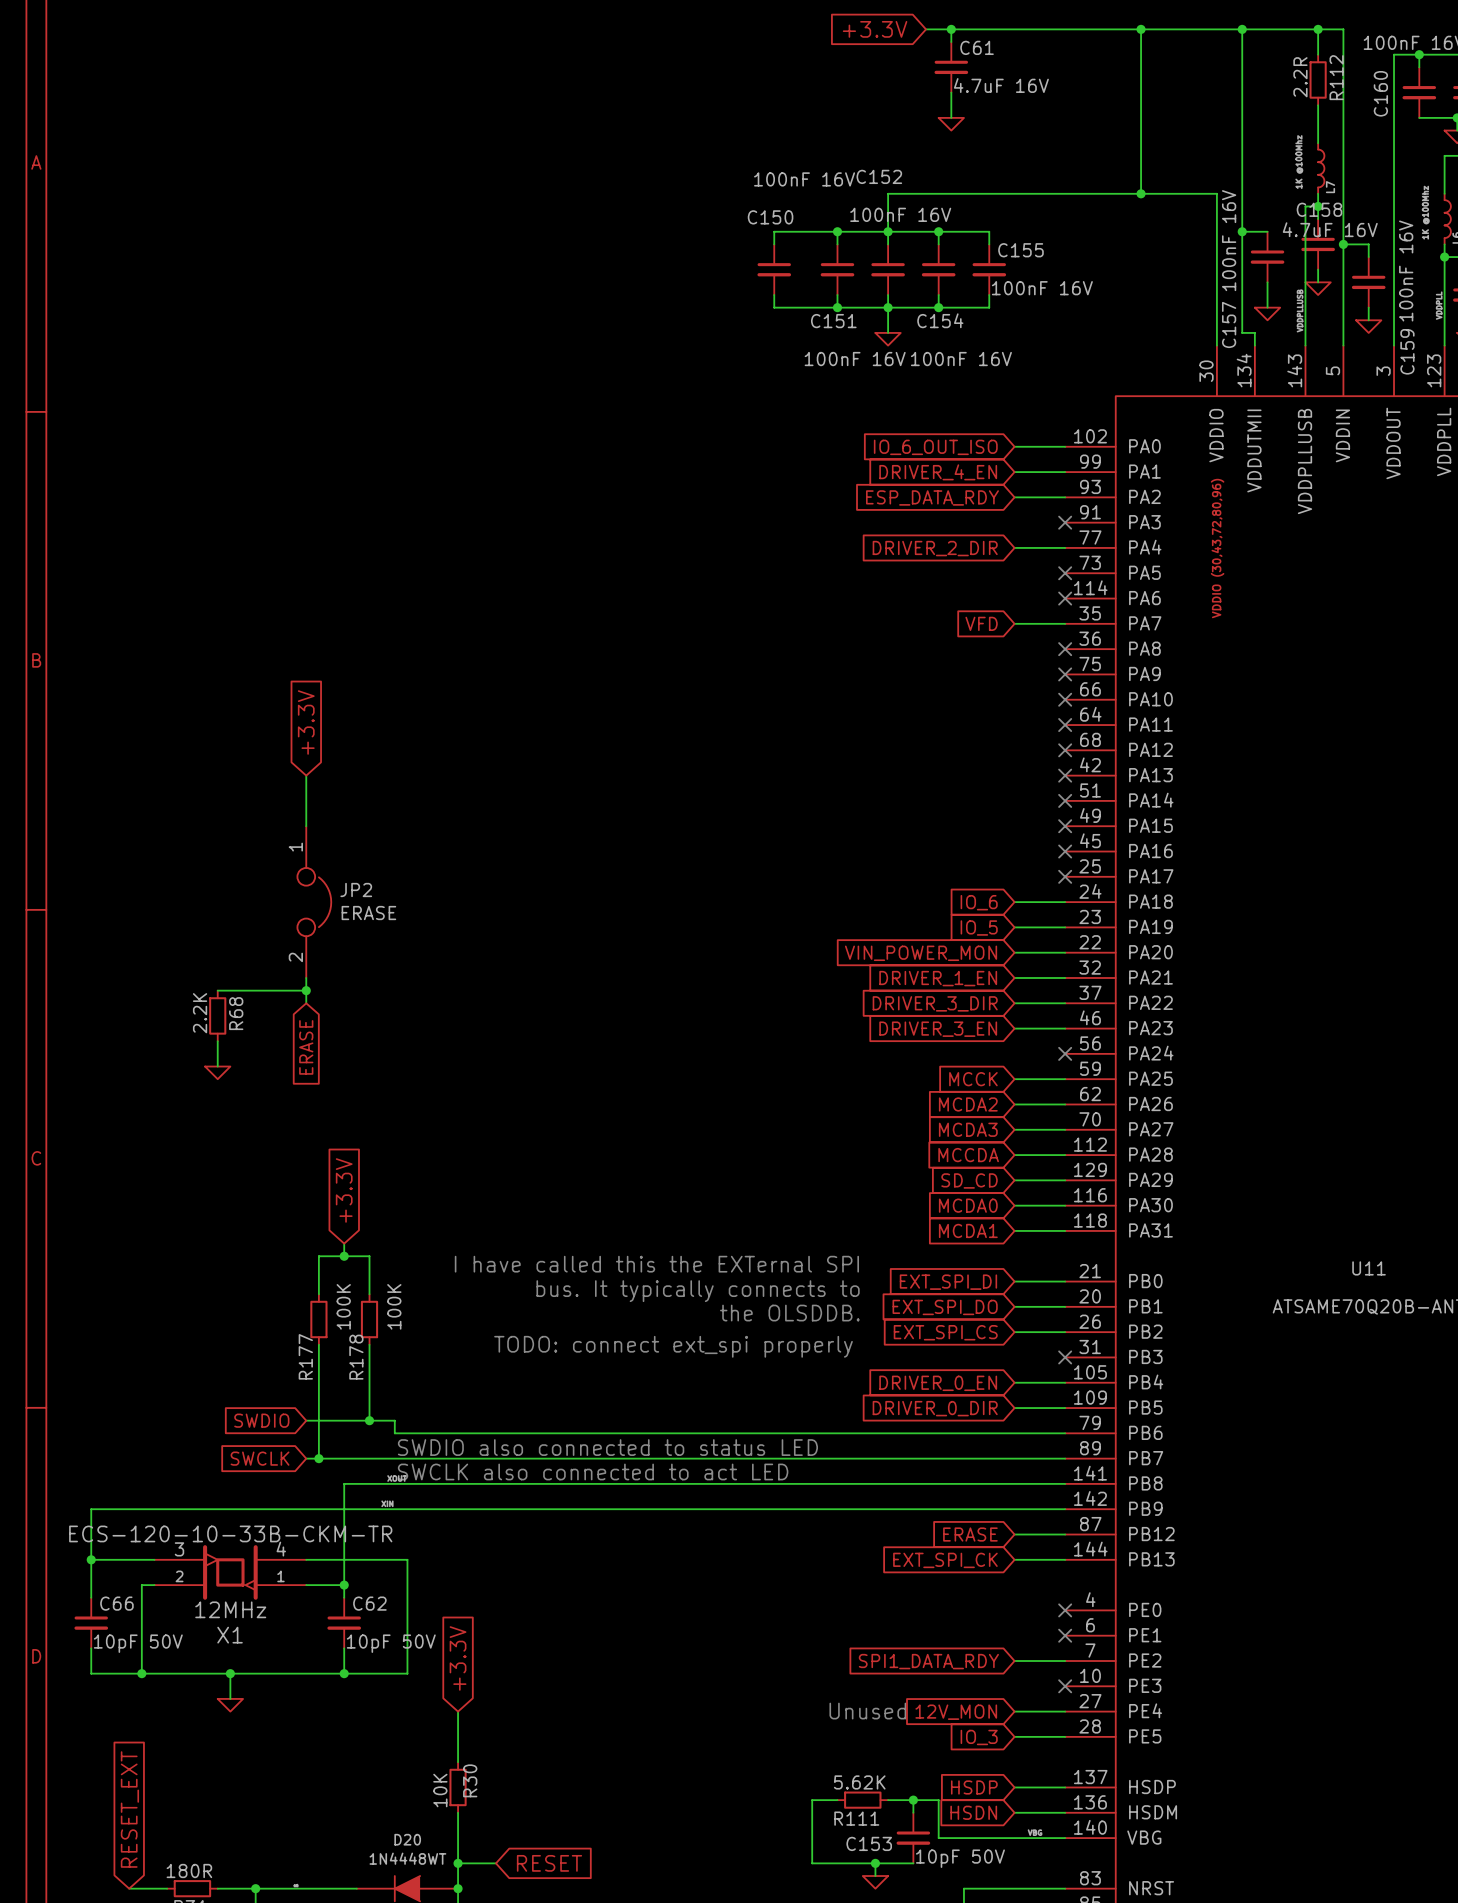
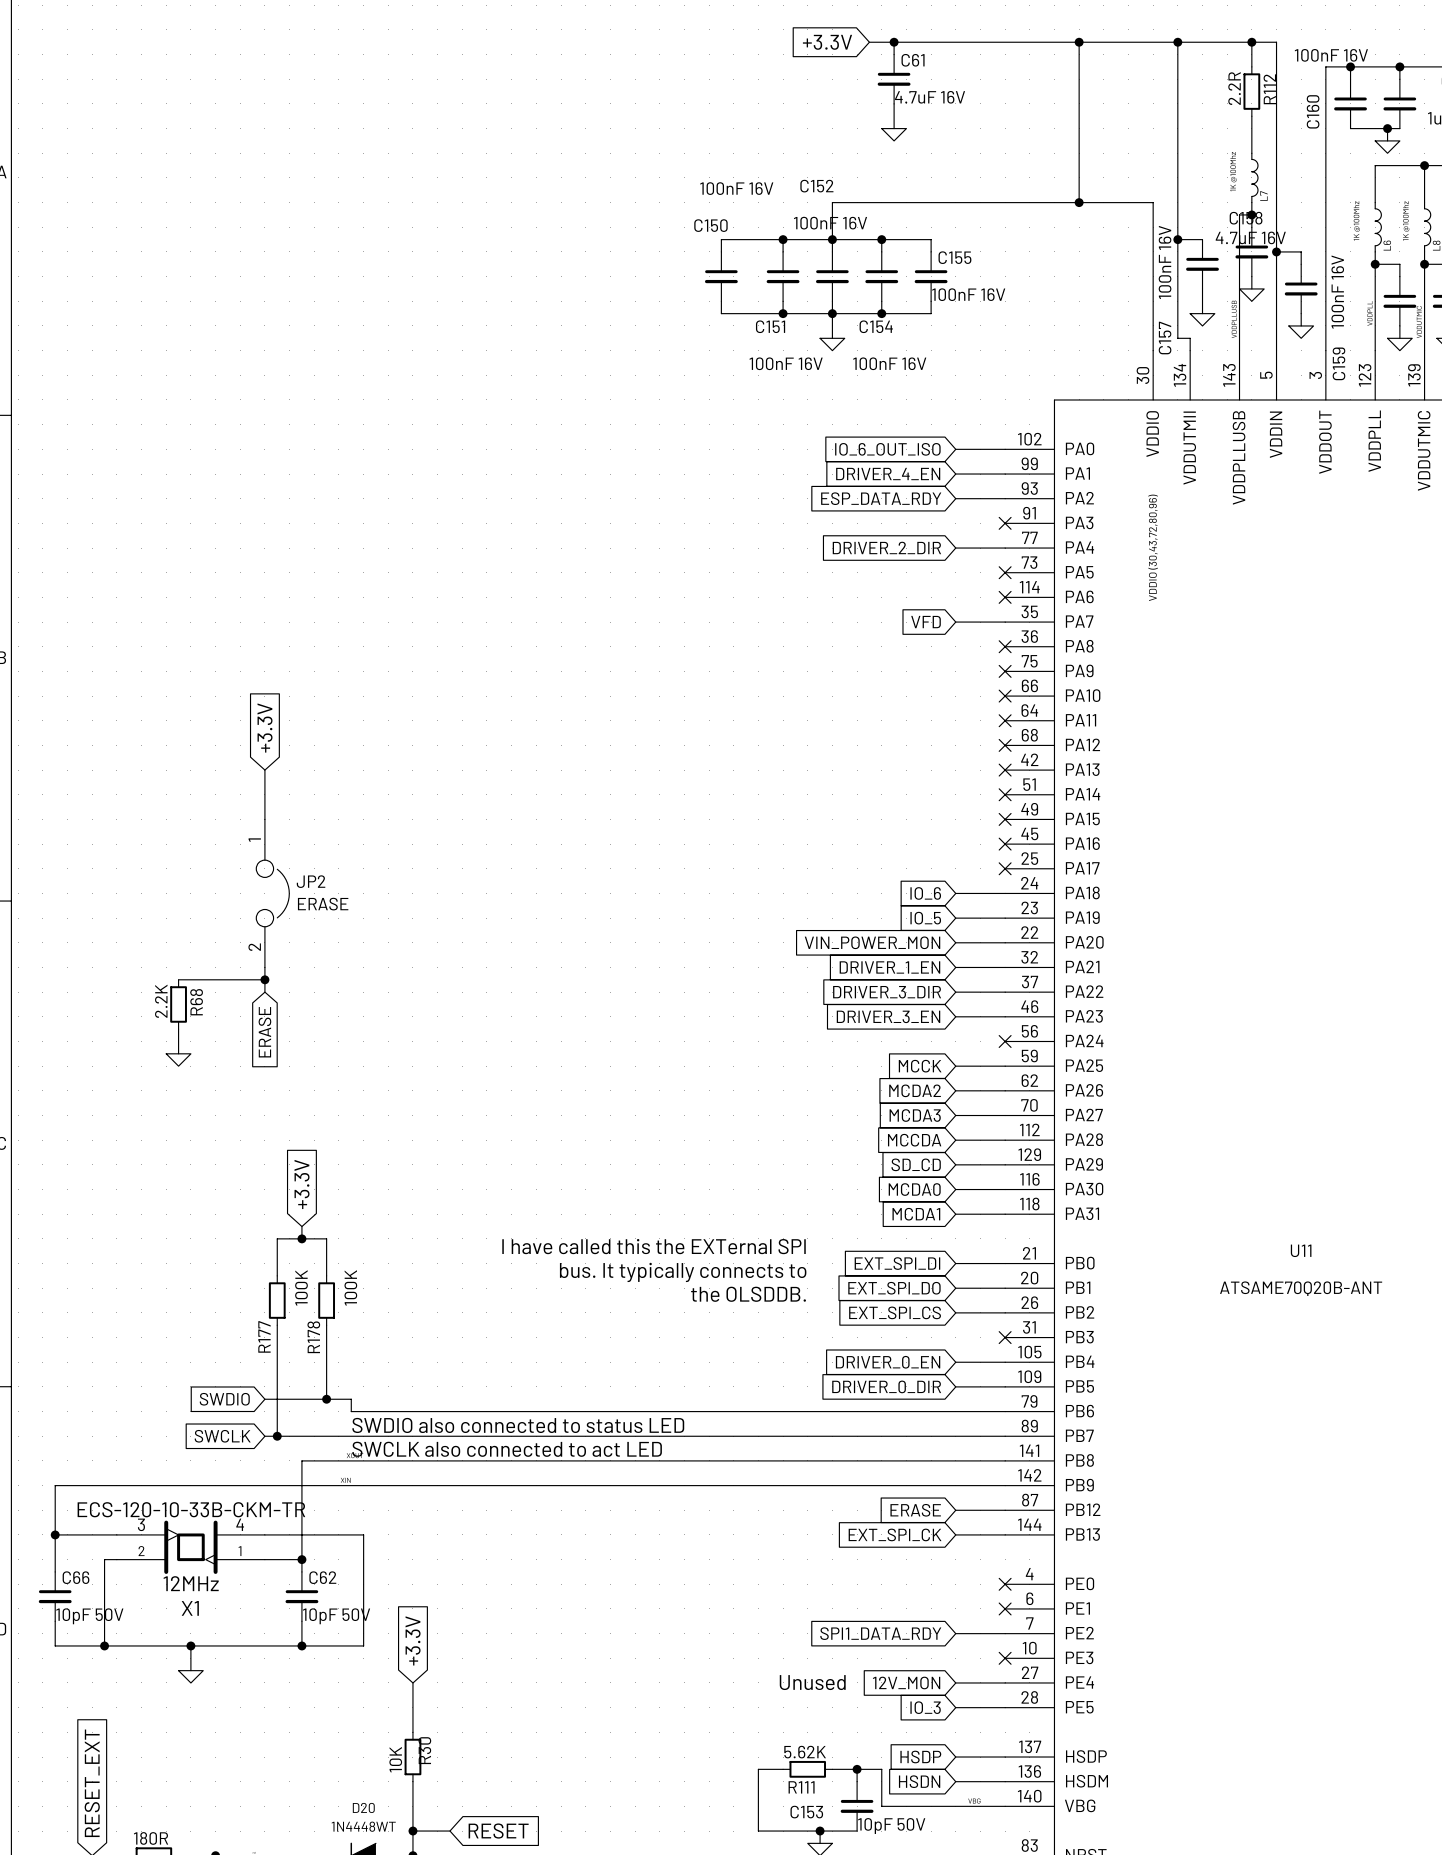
text: TODO: connect ext_spi properly (673, 1346) -> none

